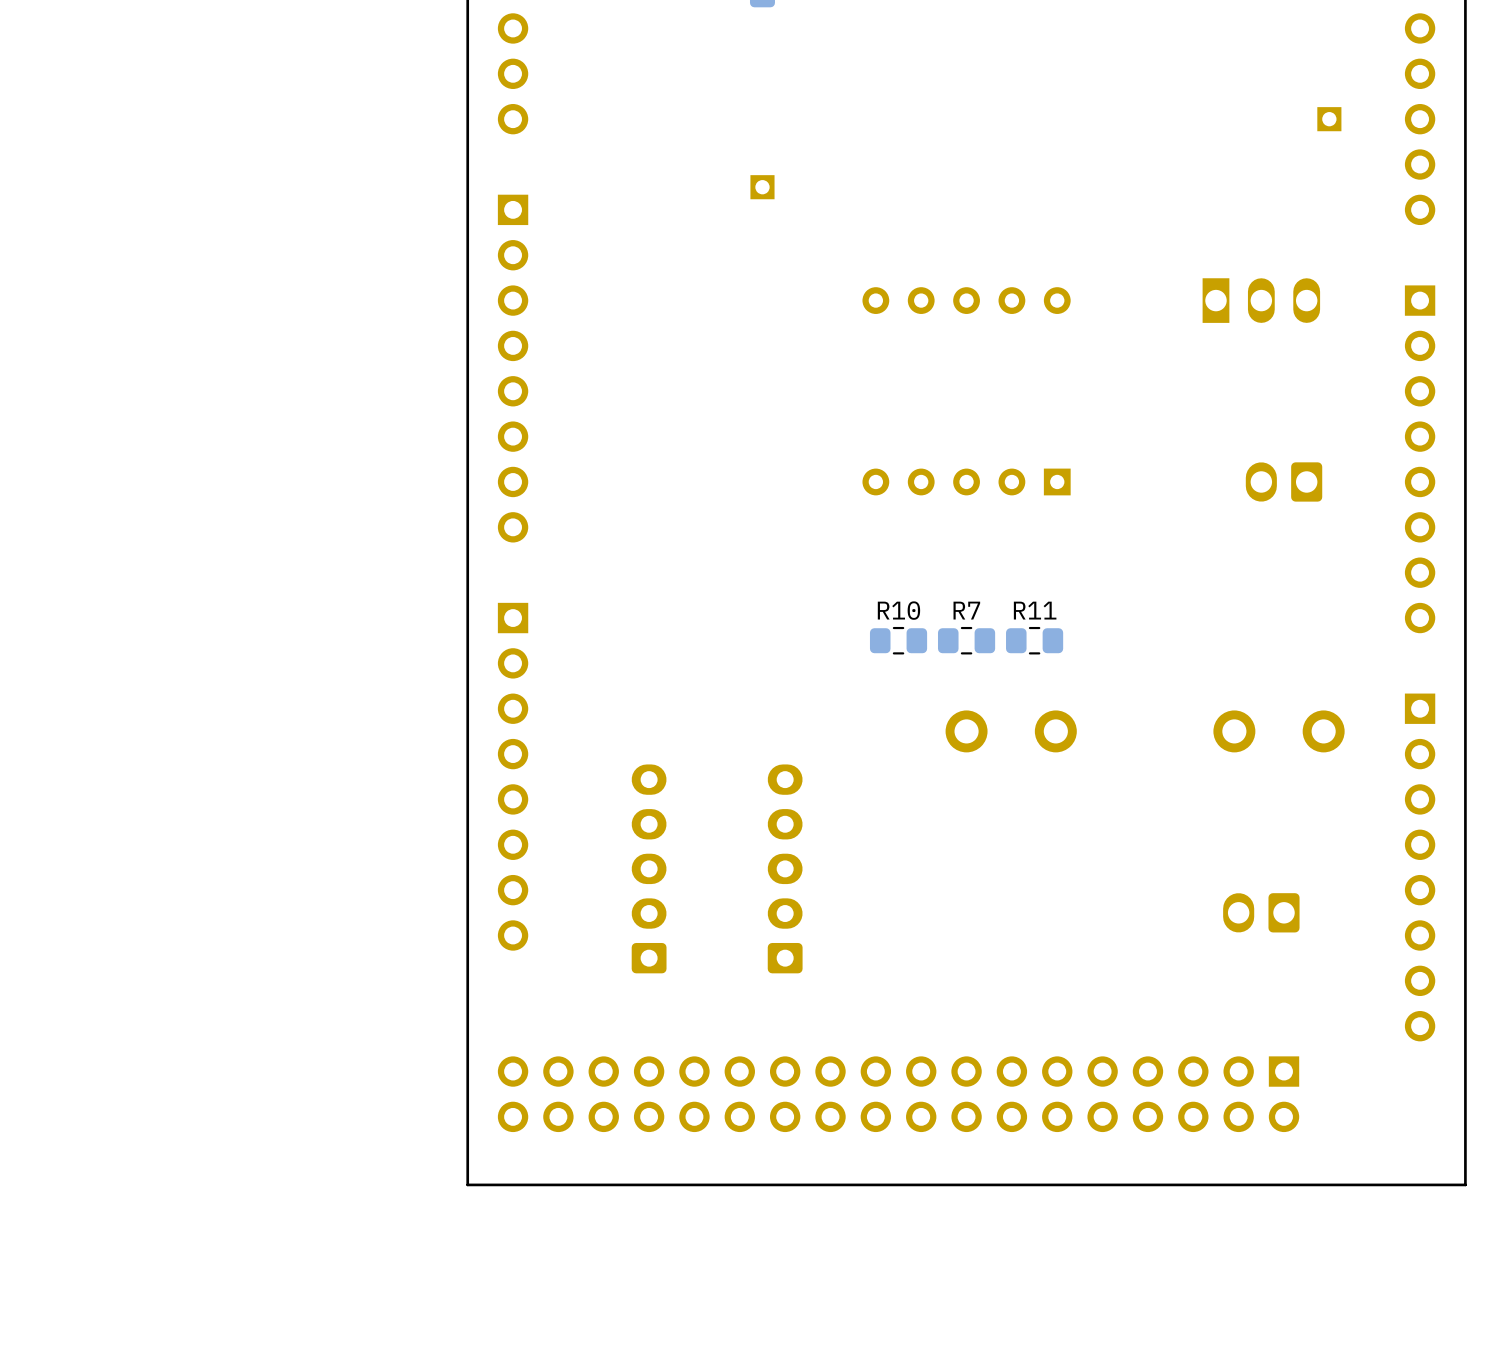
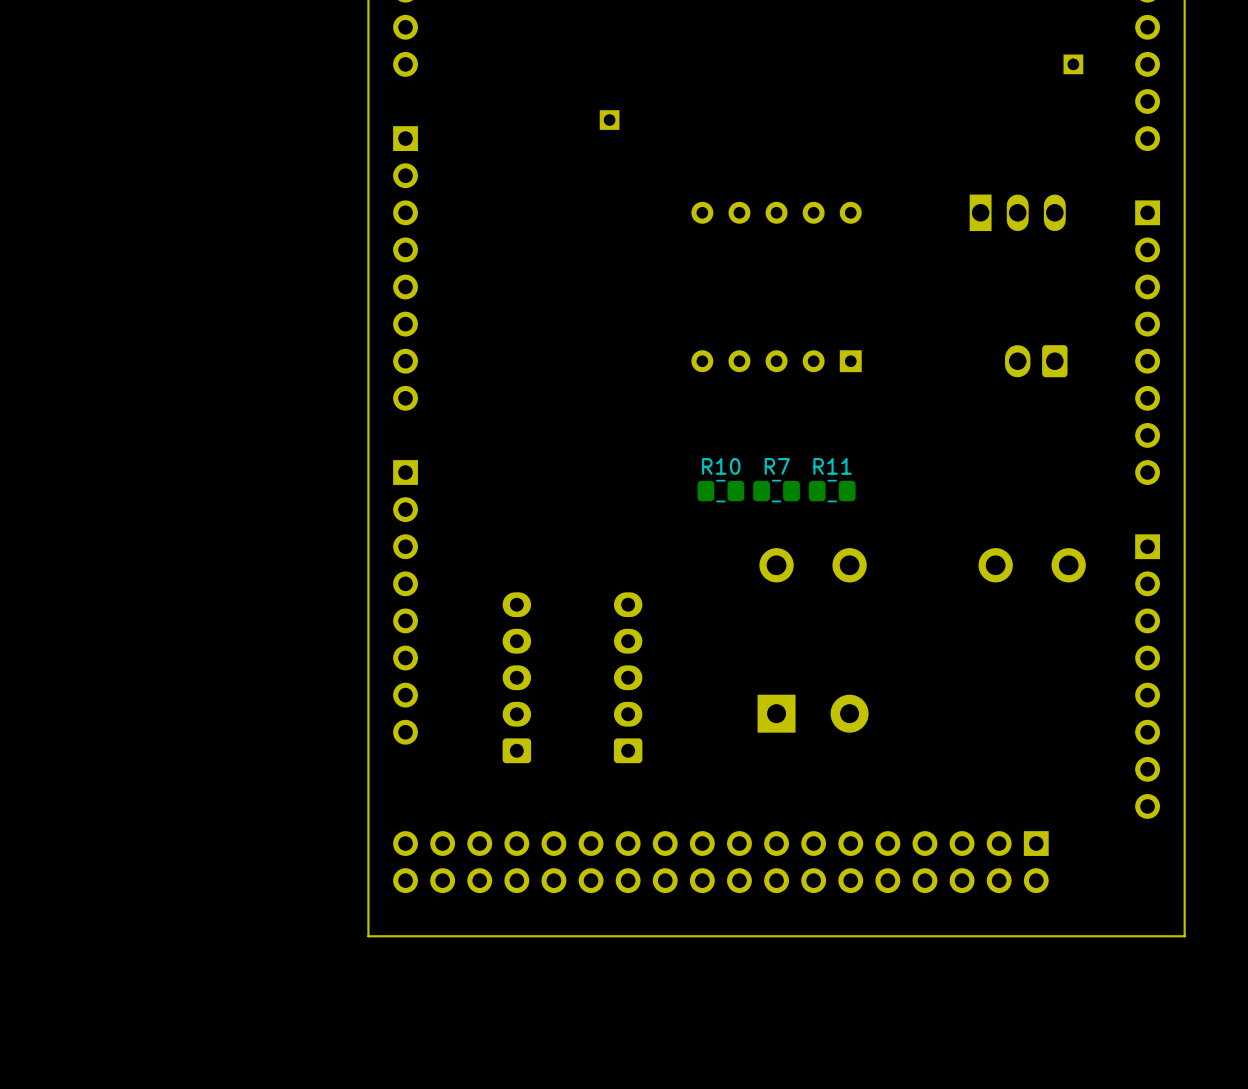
part: none -> (813, 713)
part: (1261, 912) -> none

